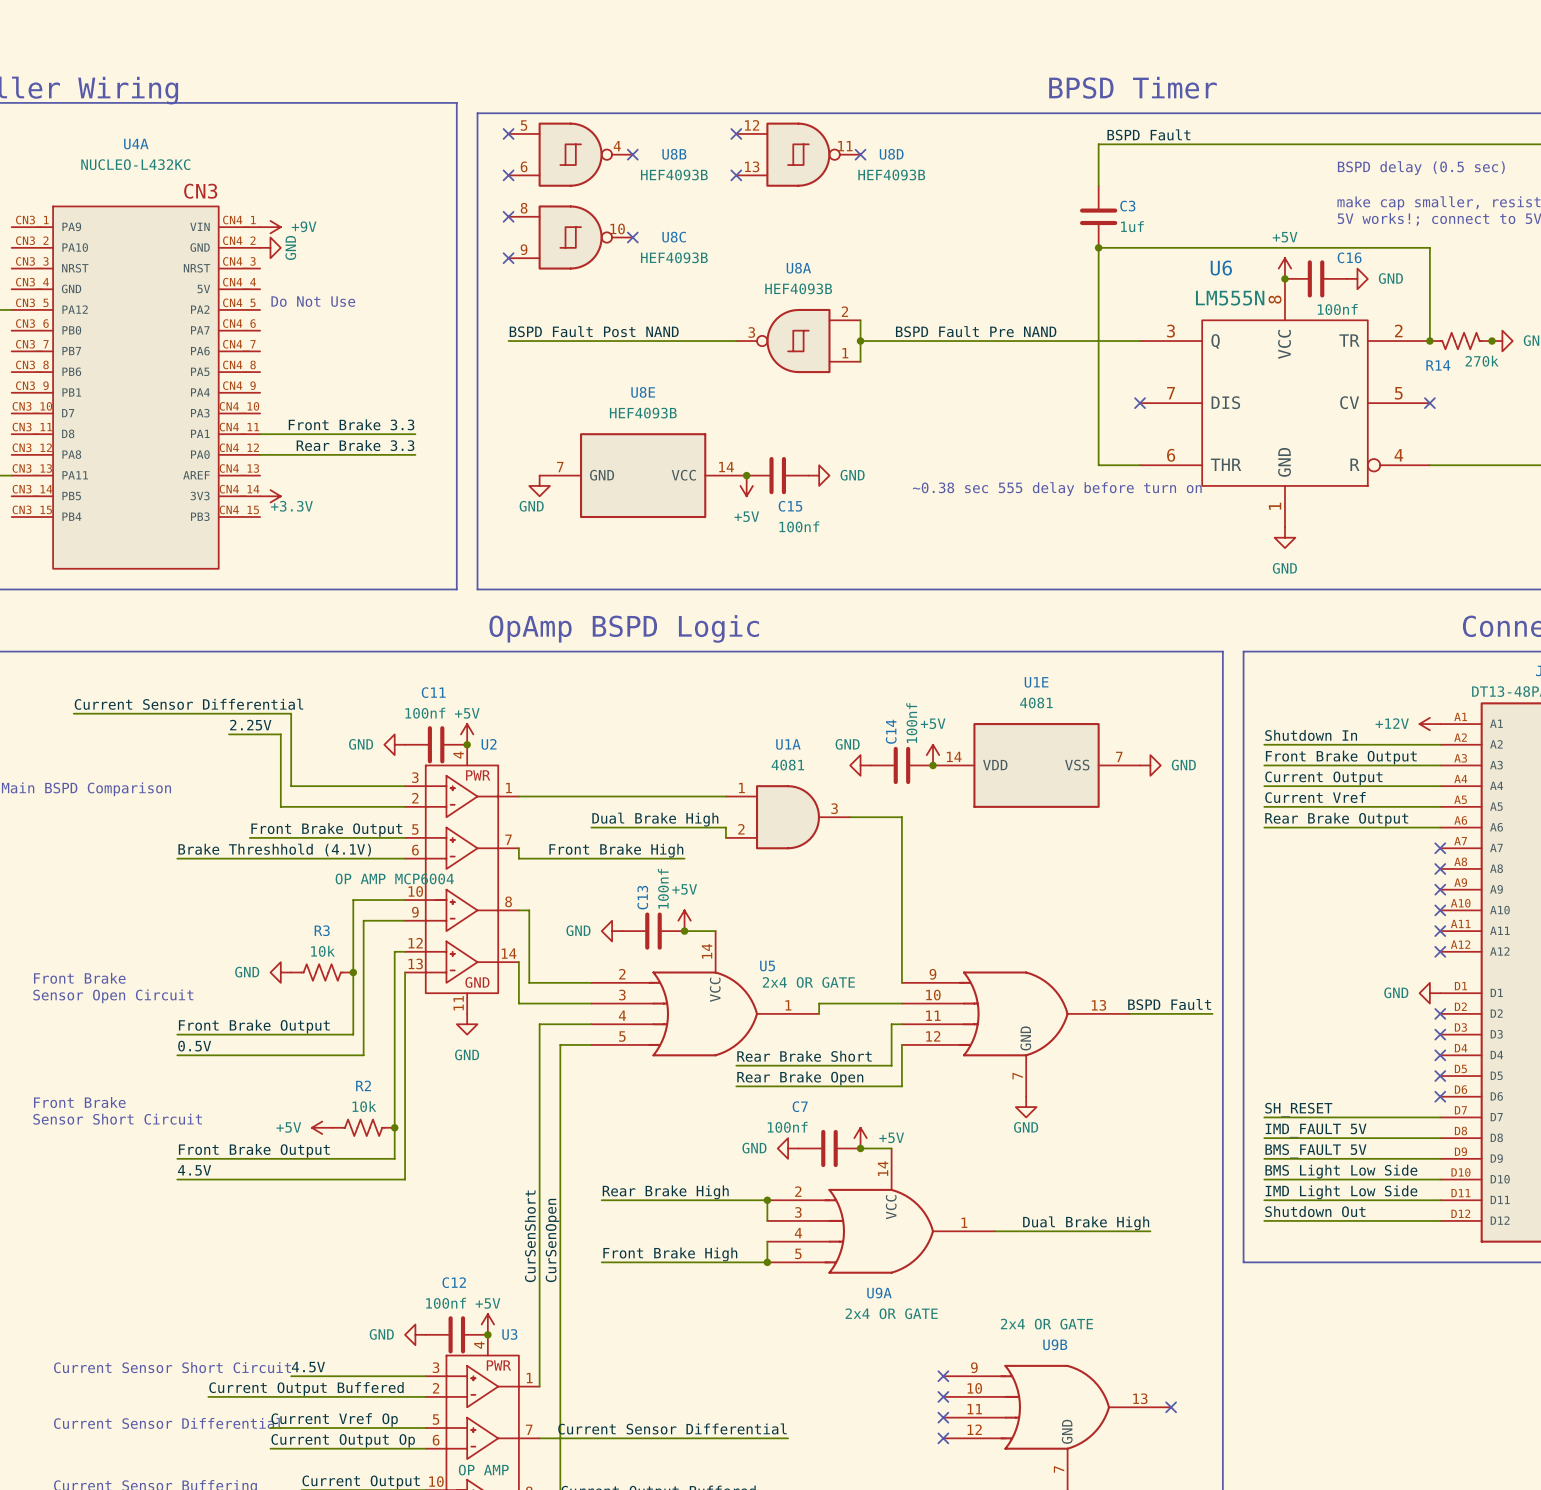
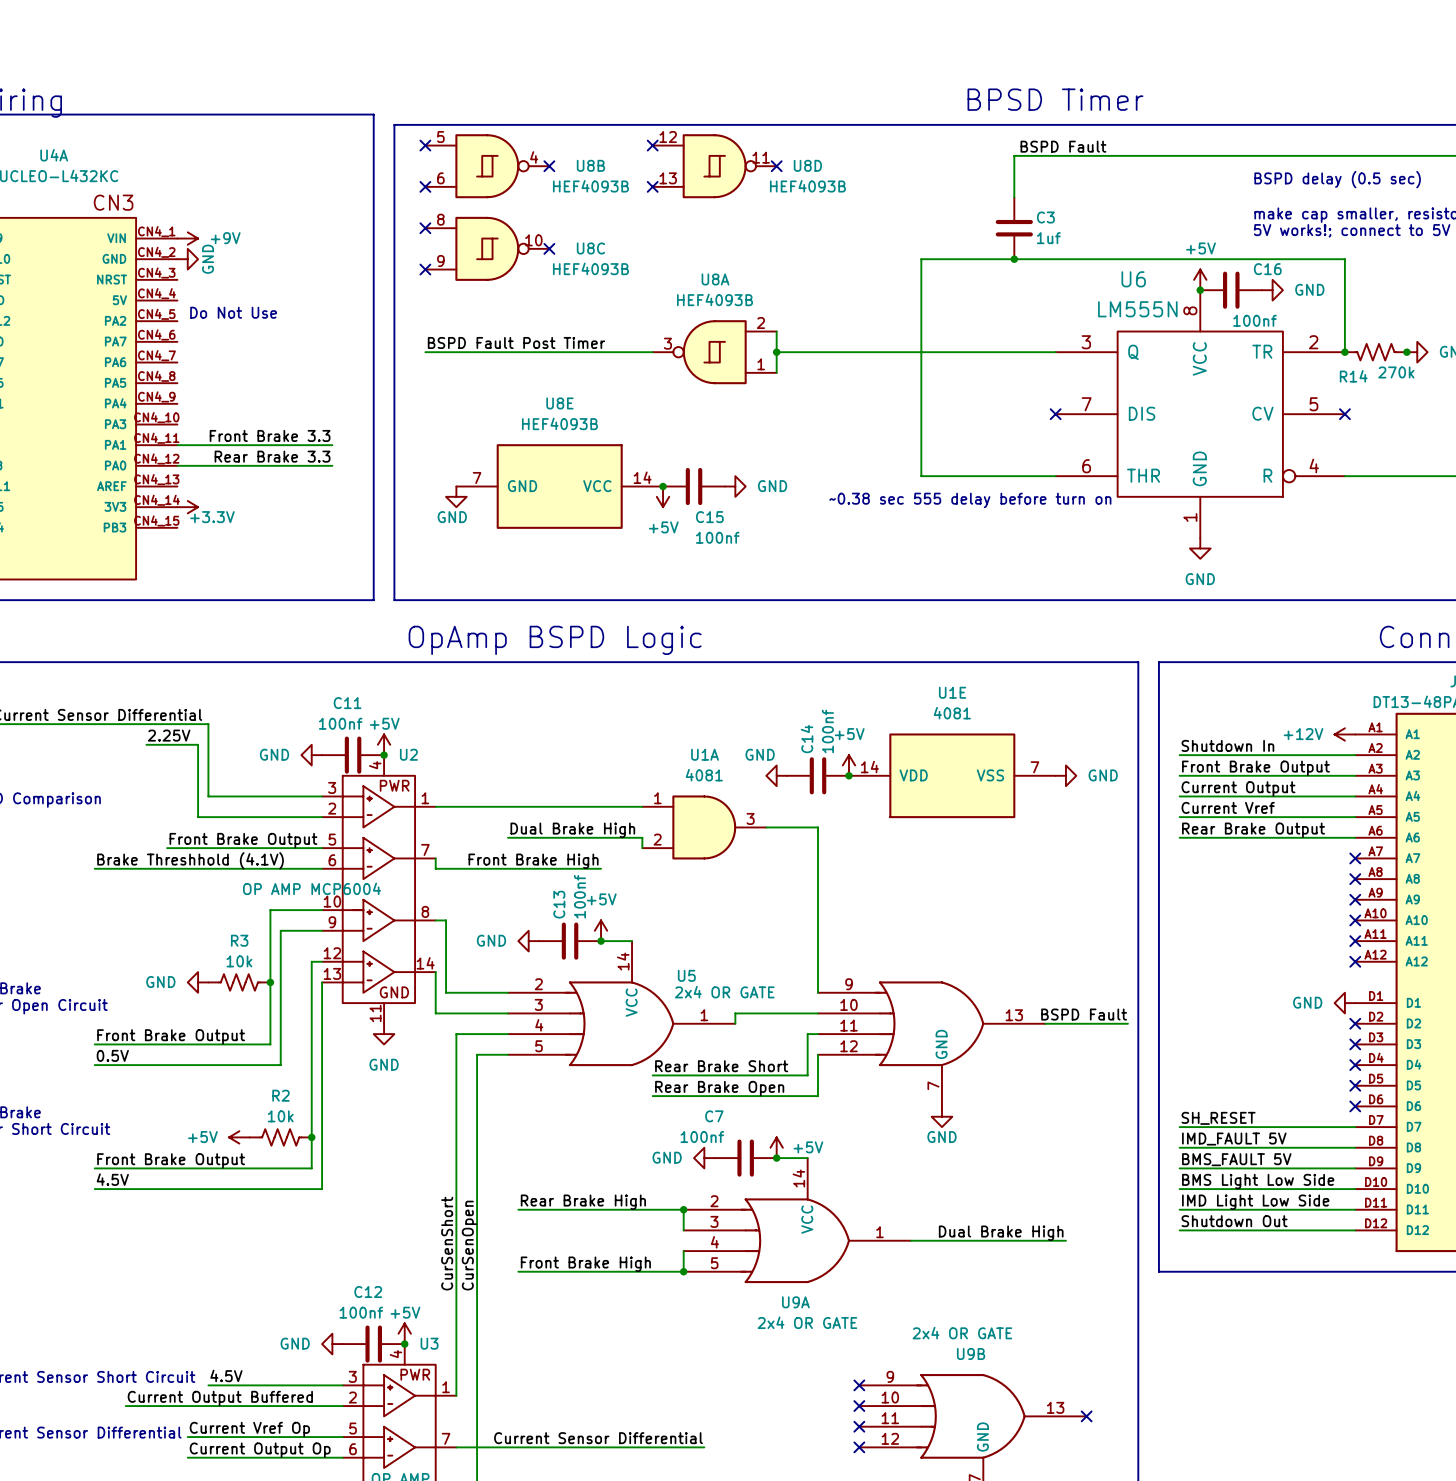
wire: (1098, 247) (1098, 465) -> (1014, 259) (921, 259) (921, 476) (1014, 476)
label: BSPD Fault Post NAND (594, 331) -> BSPD Fault Post Timer (516, 342)
label: BSPD Fault Pre NAND (976, 331) -> none

